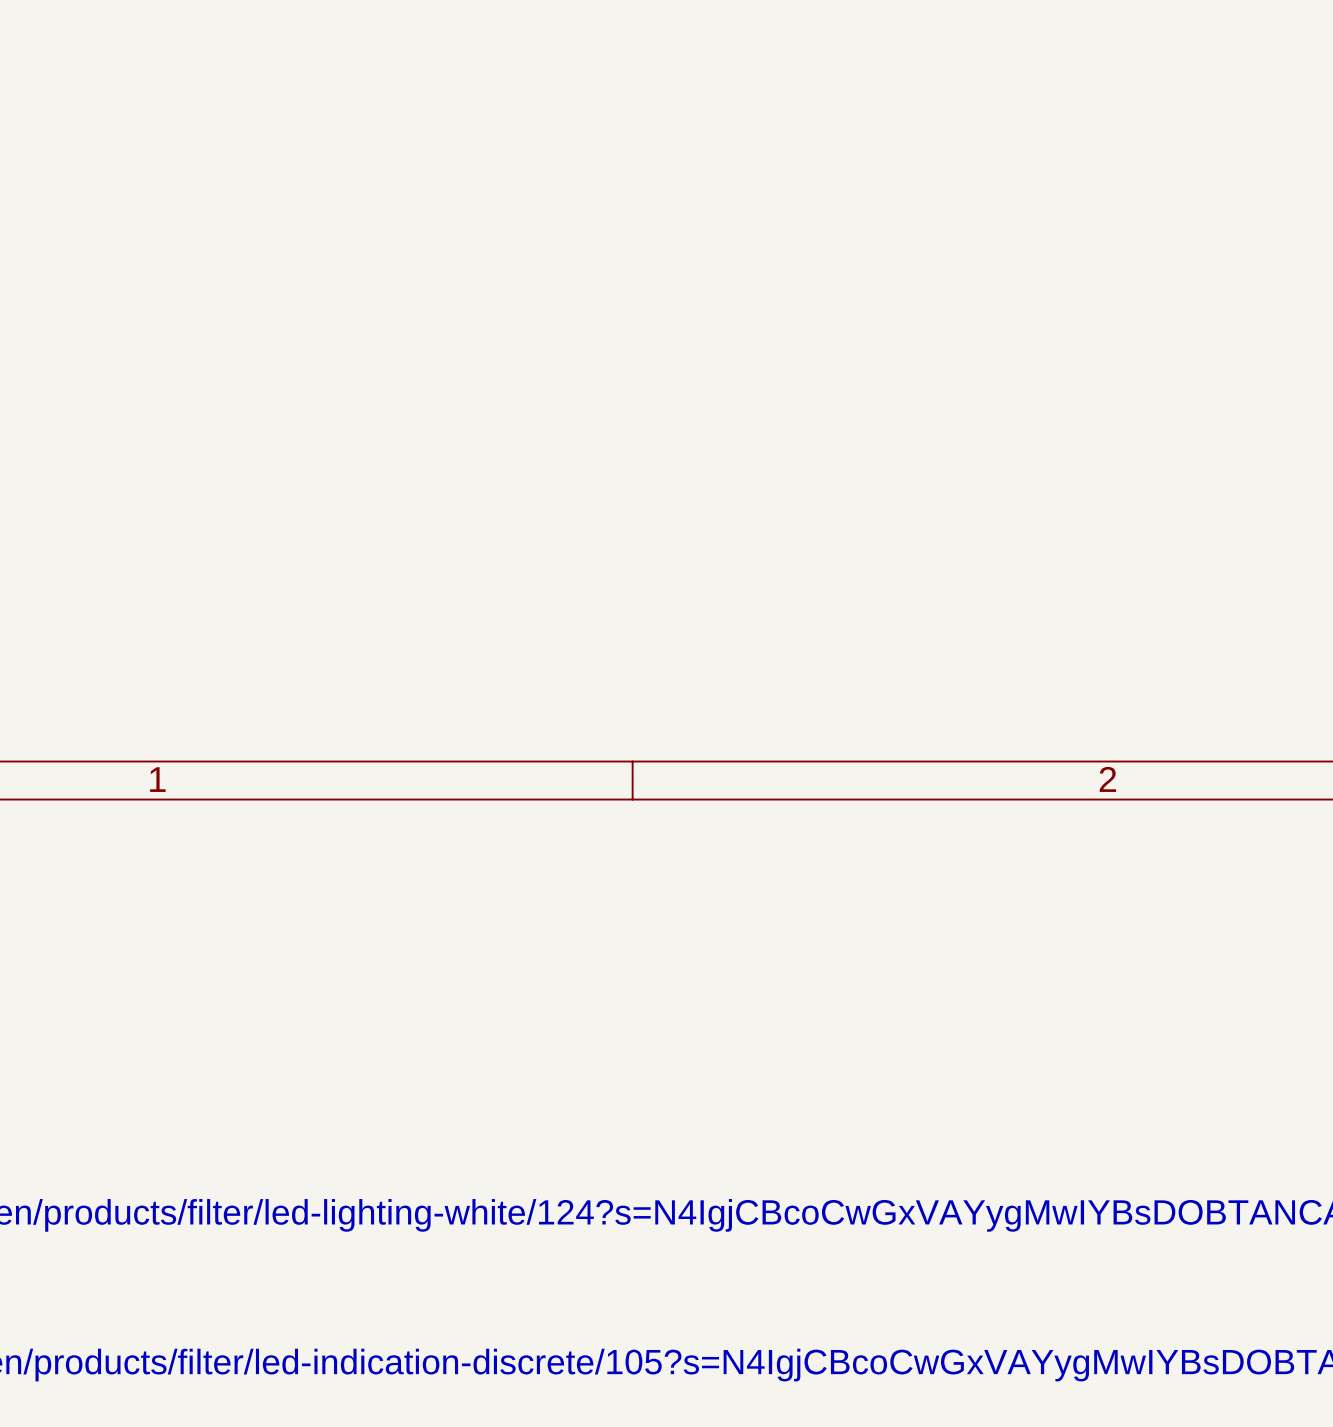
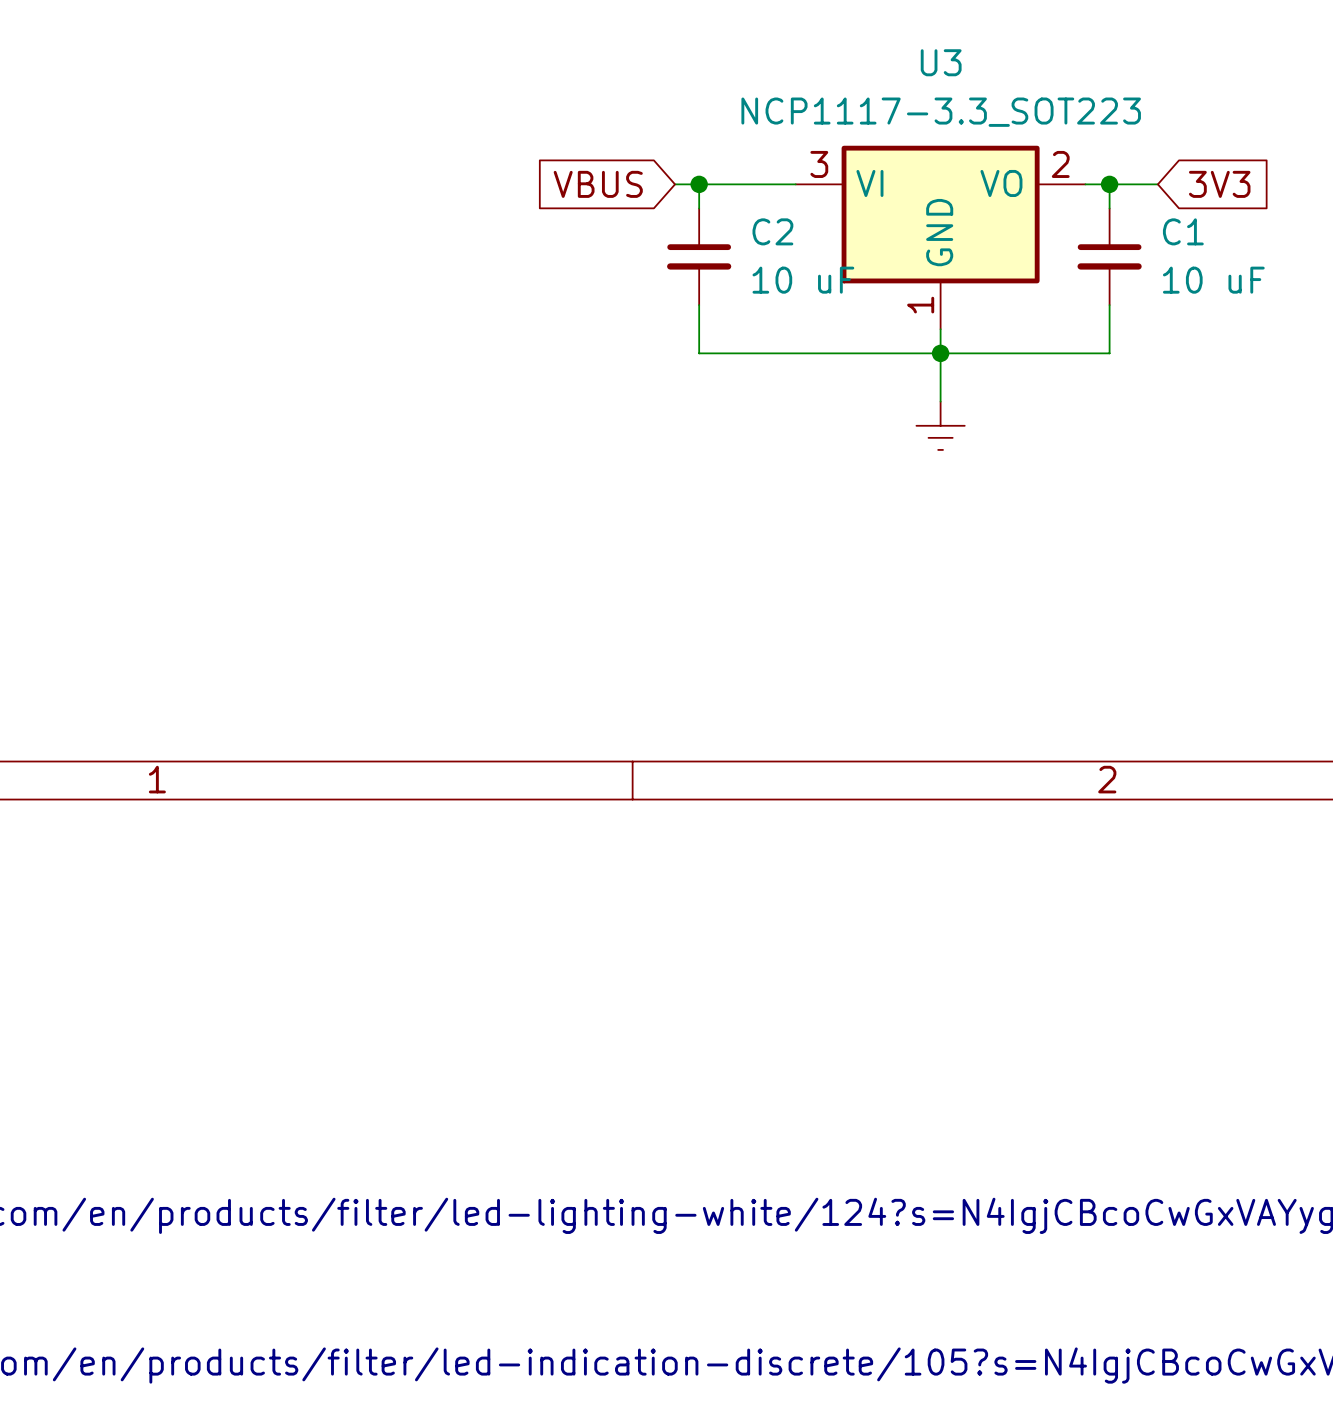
global label: none -> VBUS (598, 184)
wire: none -> (675, 184) (795, 184)
wire: none -> (699, 184) (699, 208)
junction: none -> (699, 184)
wire: none -> (1085, 184) (1157, 184)
wire: none -> (1109, 184) (1109, 208)
junction: none -> (1109, 184)
global label: none -> 3V3 (1219, 184)
U3: none -> NCP1117-3.3_SOT223 (940, 237)
C2: none -> 10 uF (699, 256)
C1: none -> 10 uF (1109, 256)
wire: none -> (699, 305) (699, 353) (1109, 353) (1109, 305)
wire: none -> (940, 329) (940, 401)
junction: none -> (940, 353)
power symbol: none -> (940, 425)

